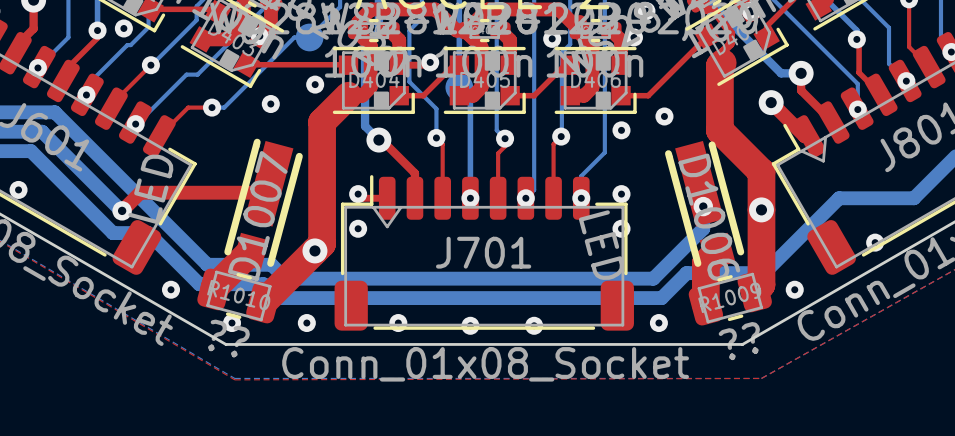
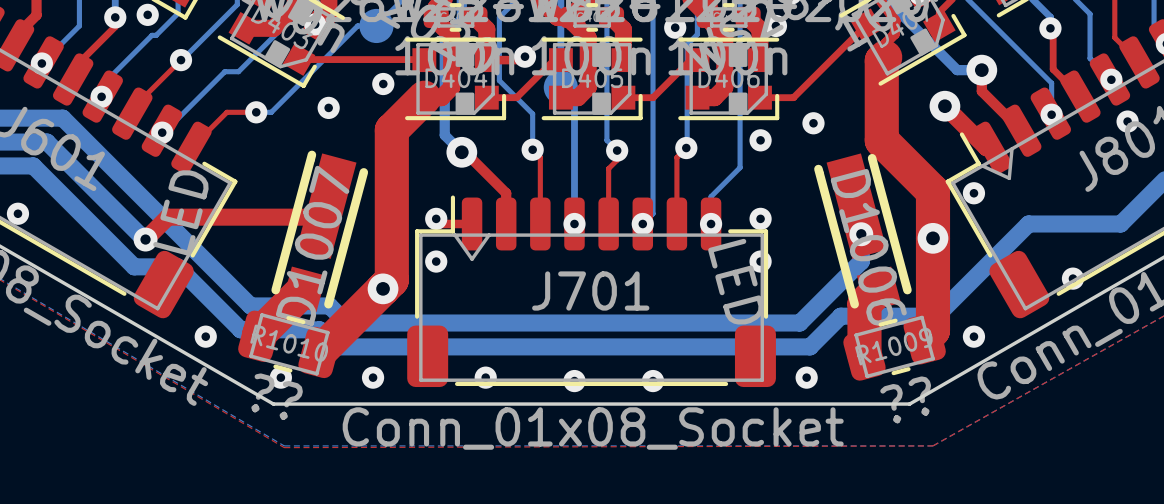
via: none -> (1127, 121)
via: none -> (973, 193)

